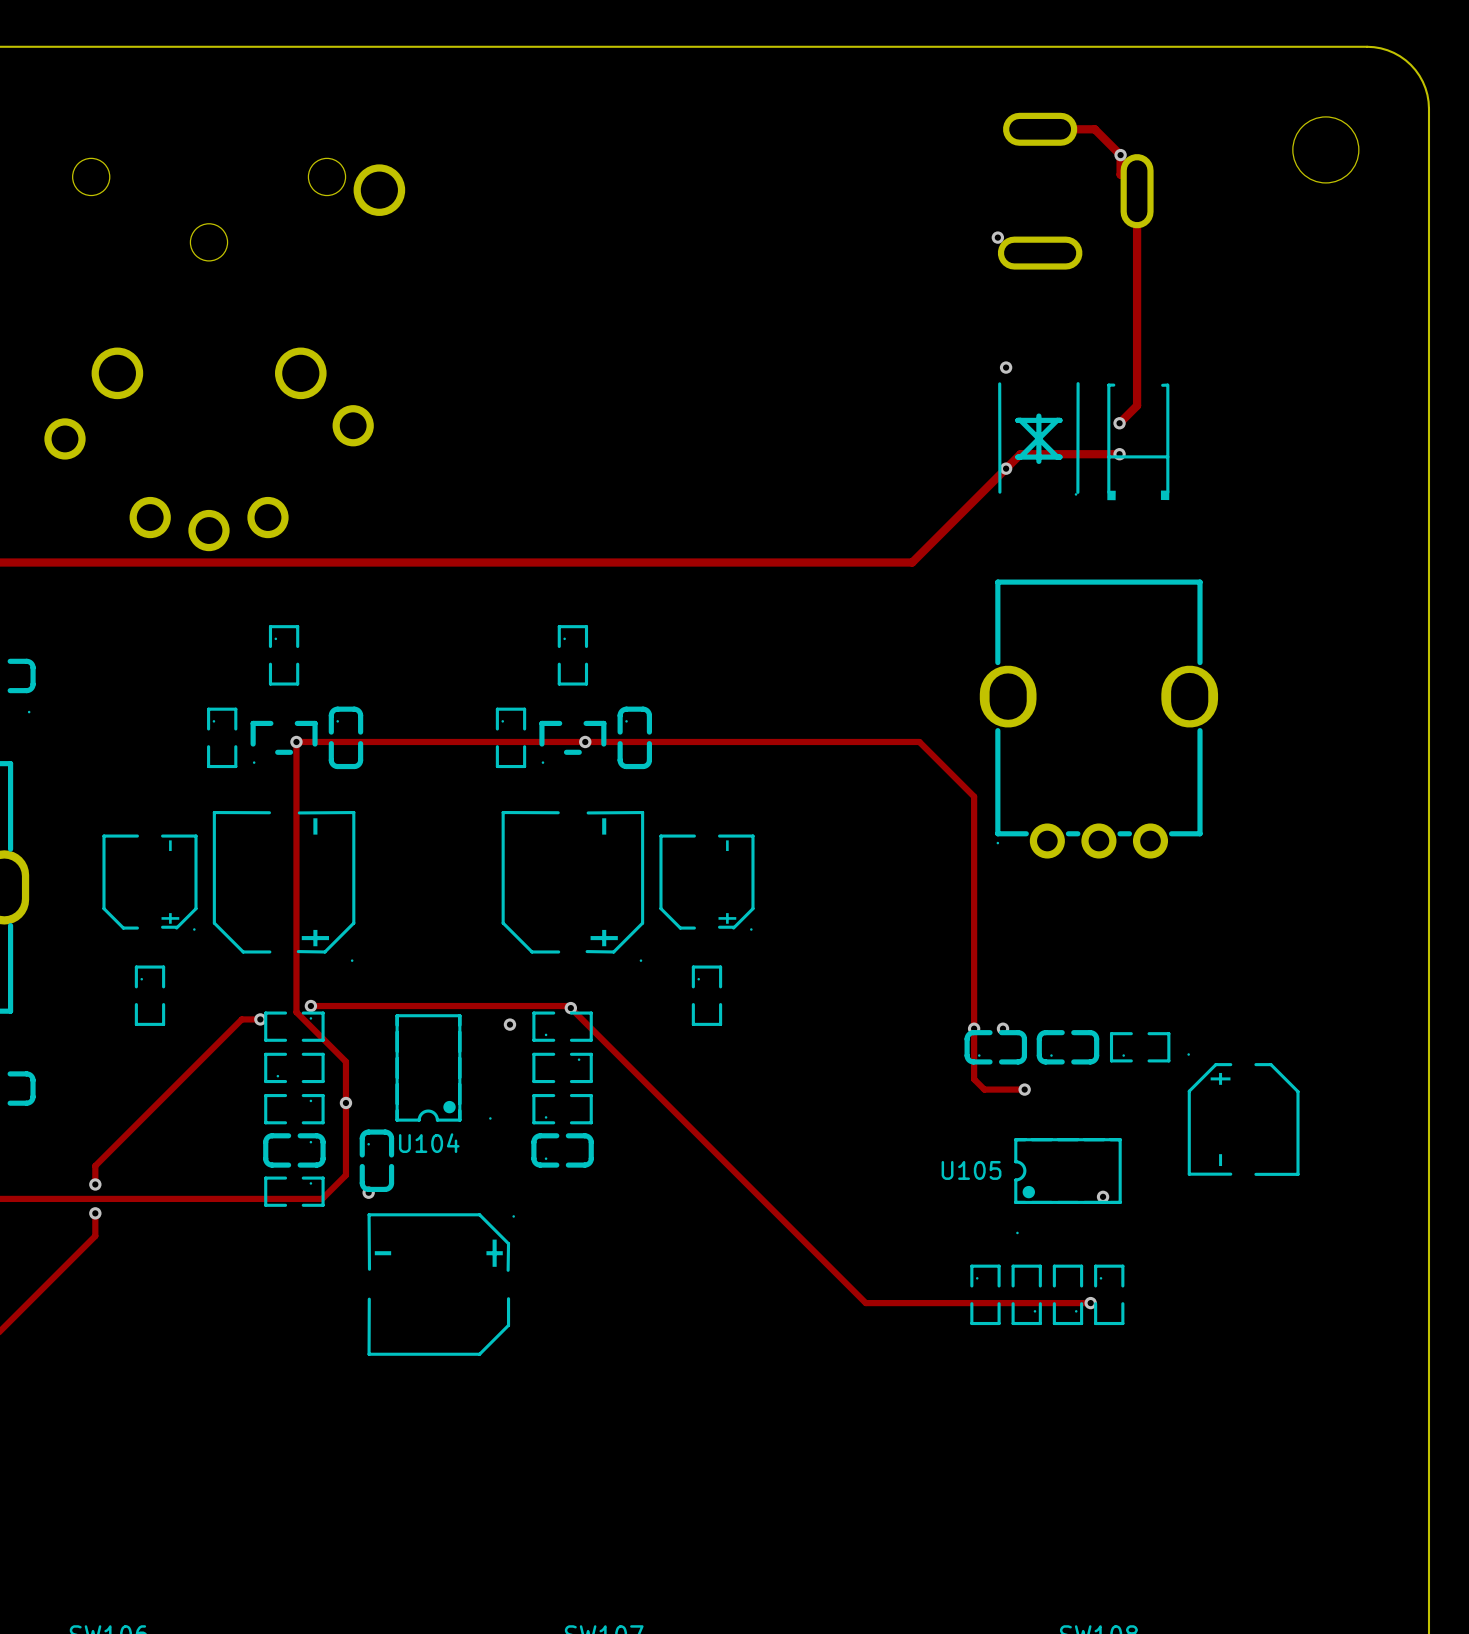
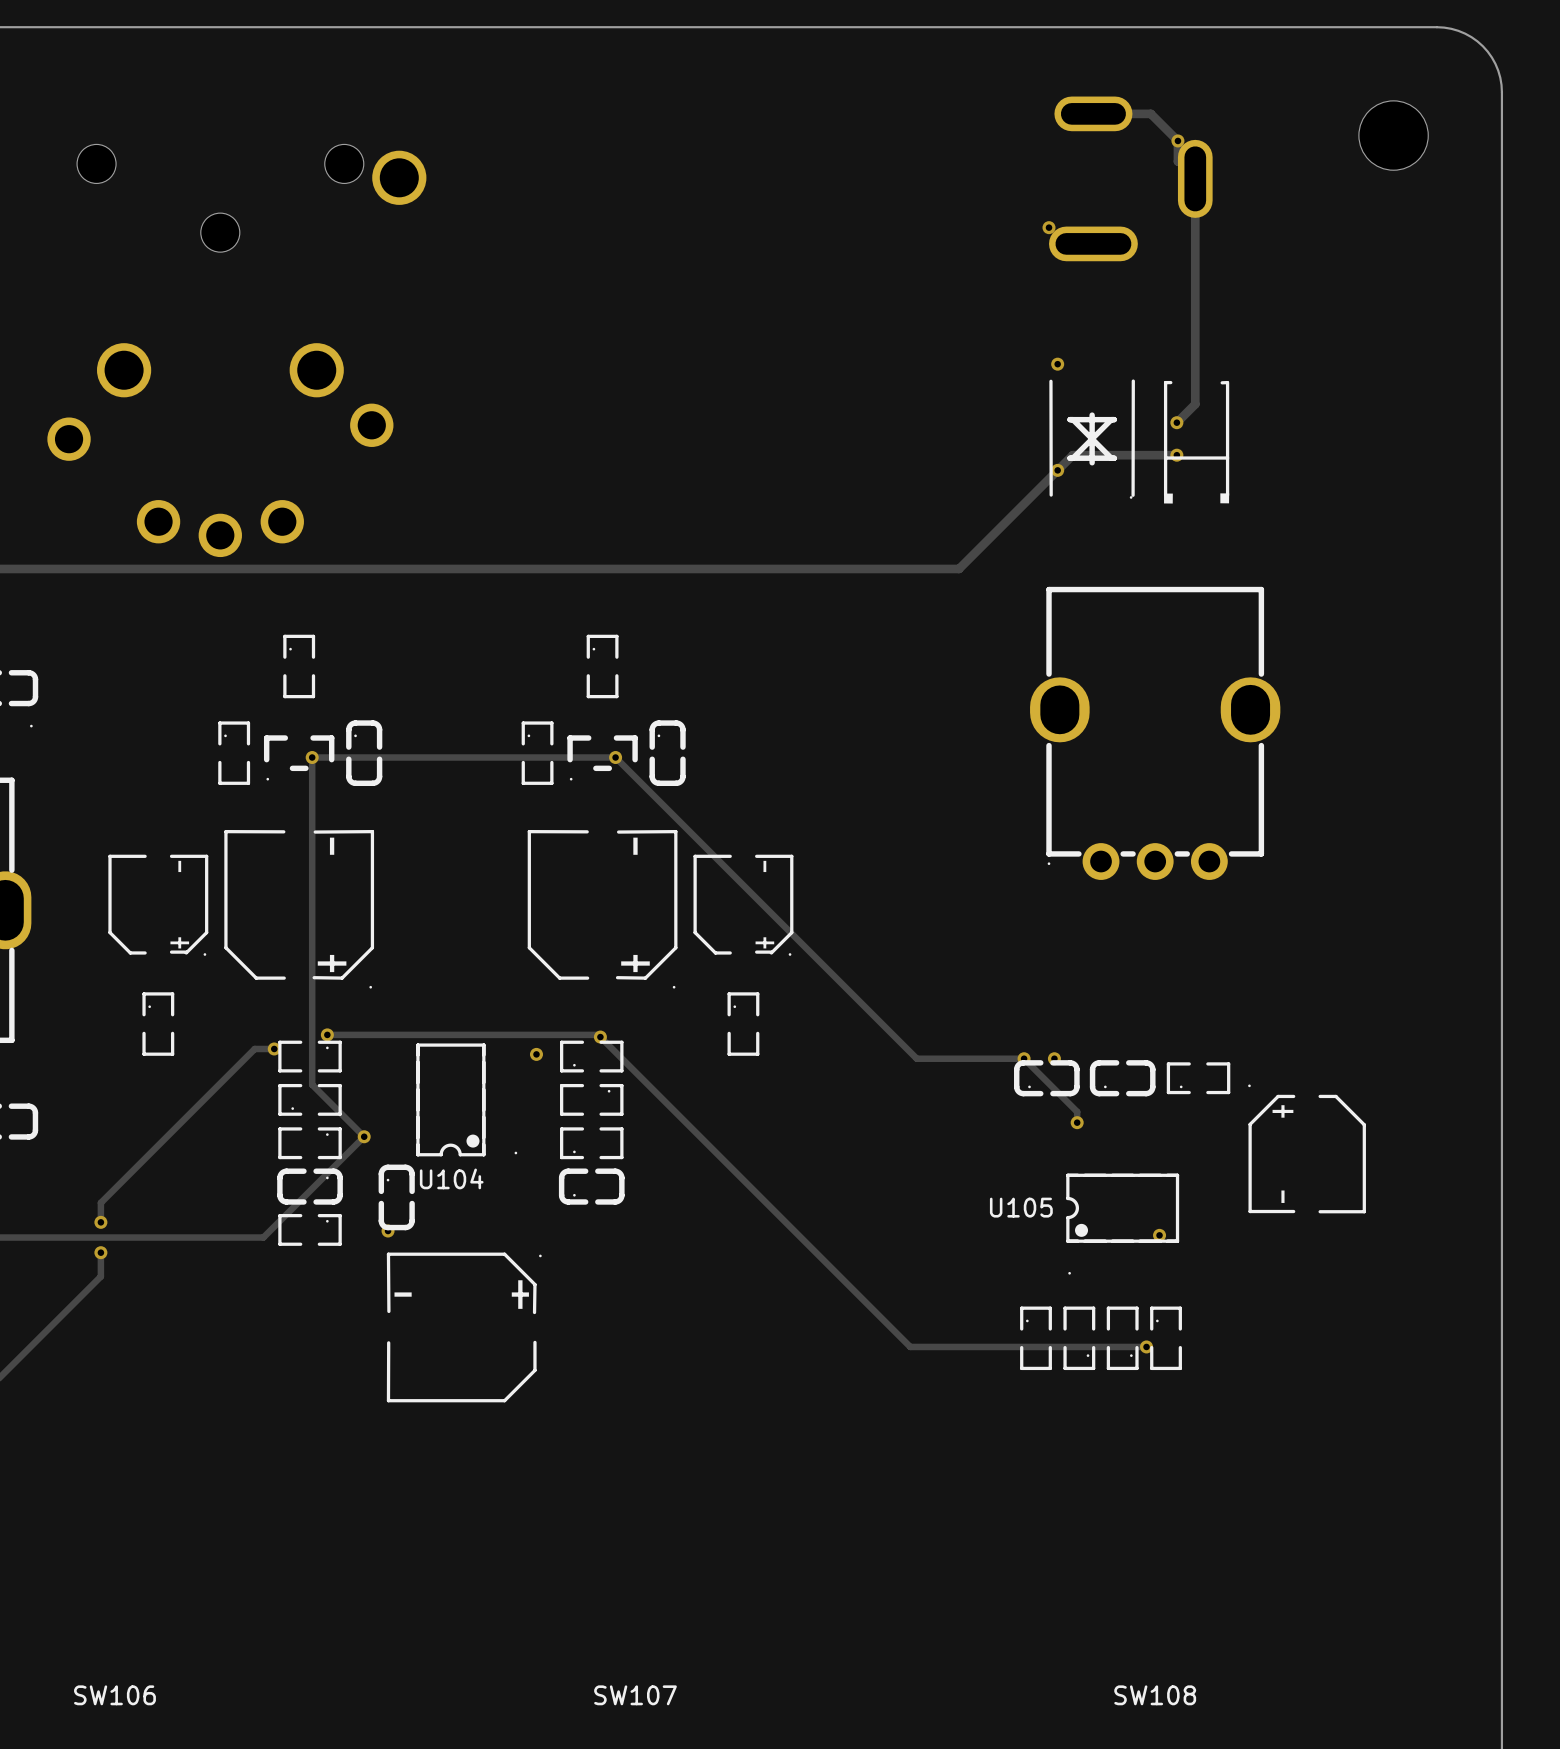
track: (585, 741) (919, 741) (974, 796) (974, 1079) (984, 1089) (1024, 1089) -> (615, 757) (916, 1058) (1024, 1058) (1077, 1111) (1077, 1122)
track: (296, 1012) (345, 1061) (345, 1175) (322, 1198) (250, 1198) -> (312, 1041) (312, 1084) (364, 1136) (263, 1237)

